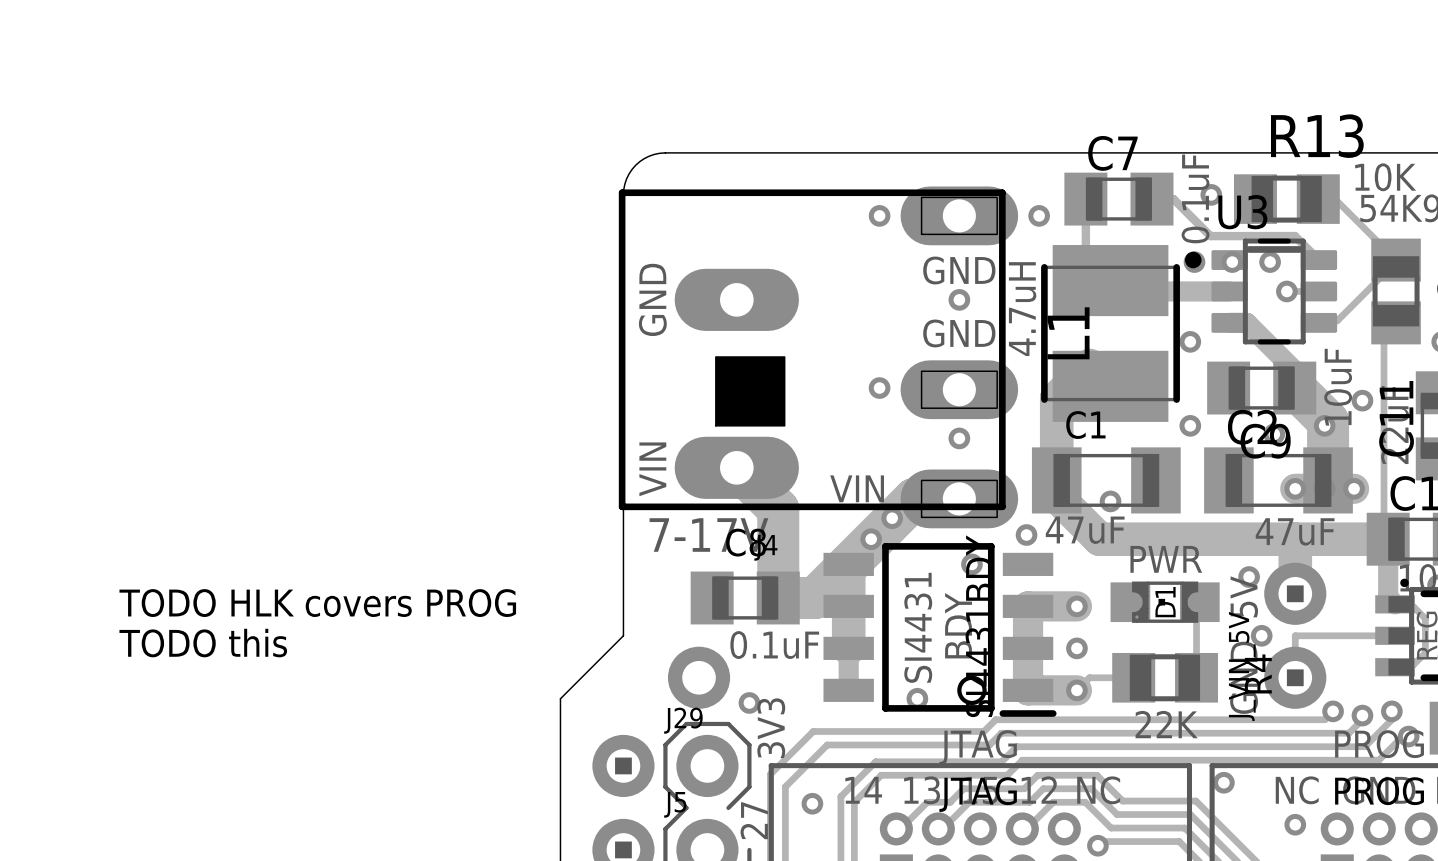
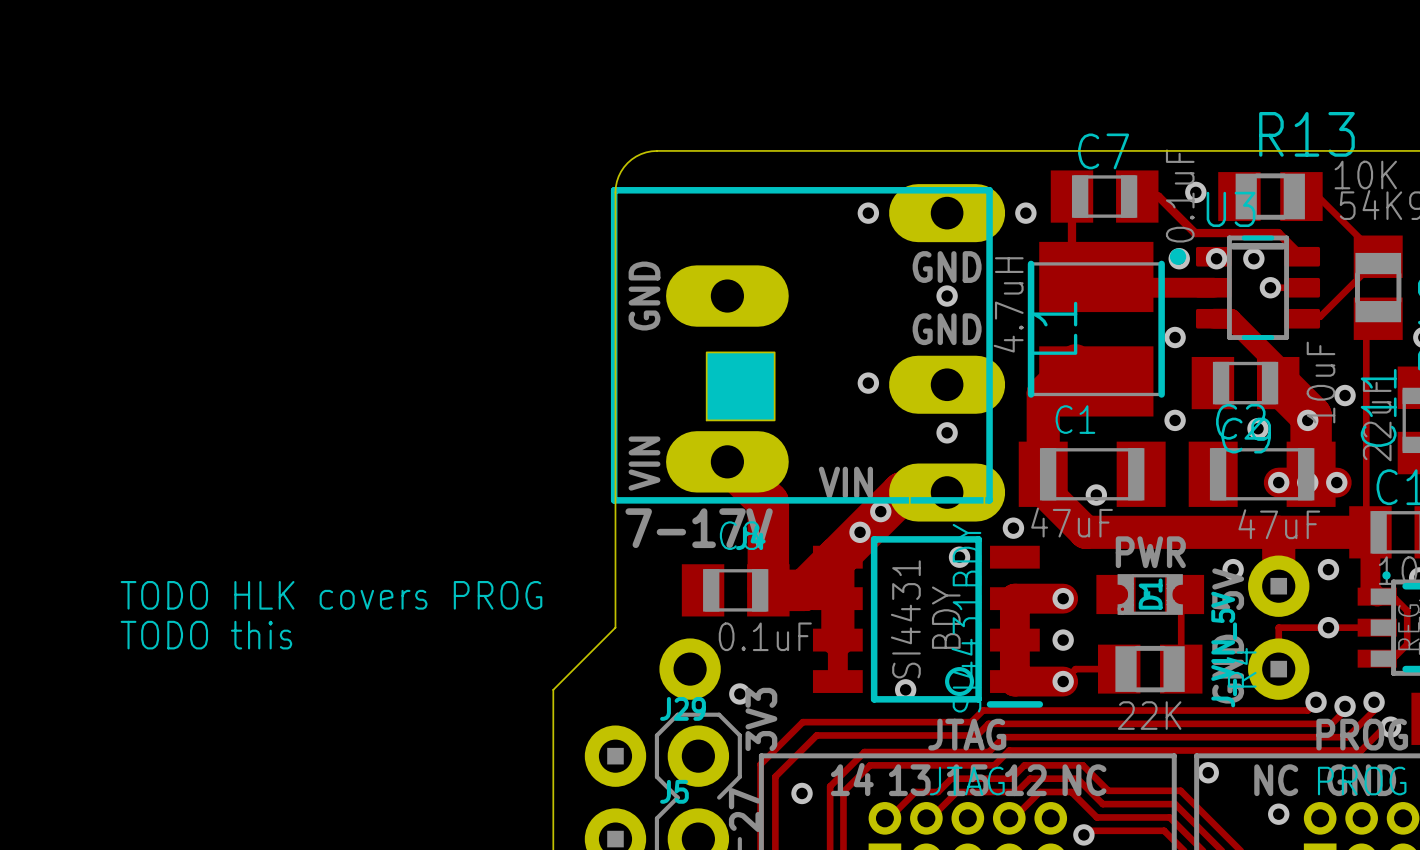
via: none -> (1328, 569)
via: (1261, 635) -> none
via: none -> (1328, 627)

